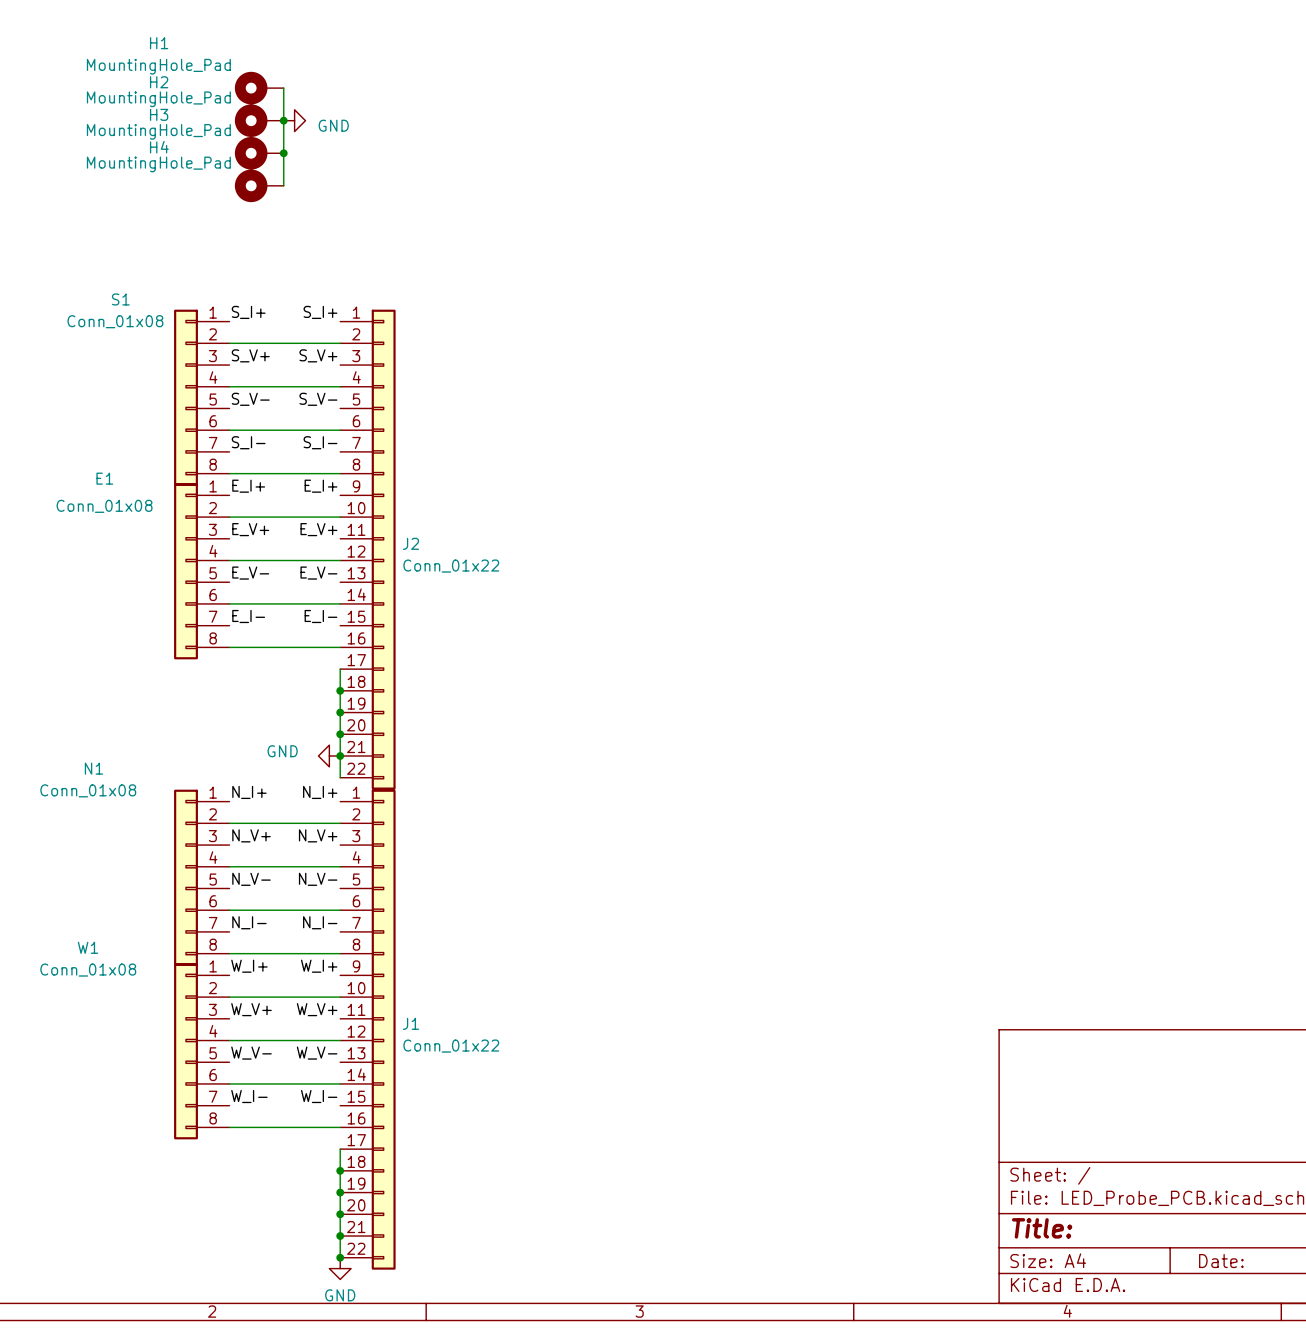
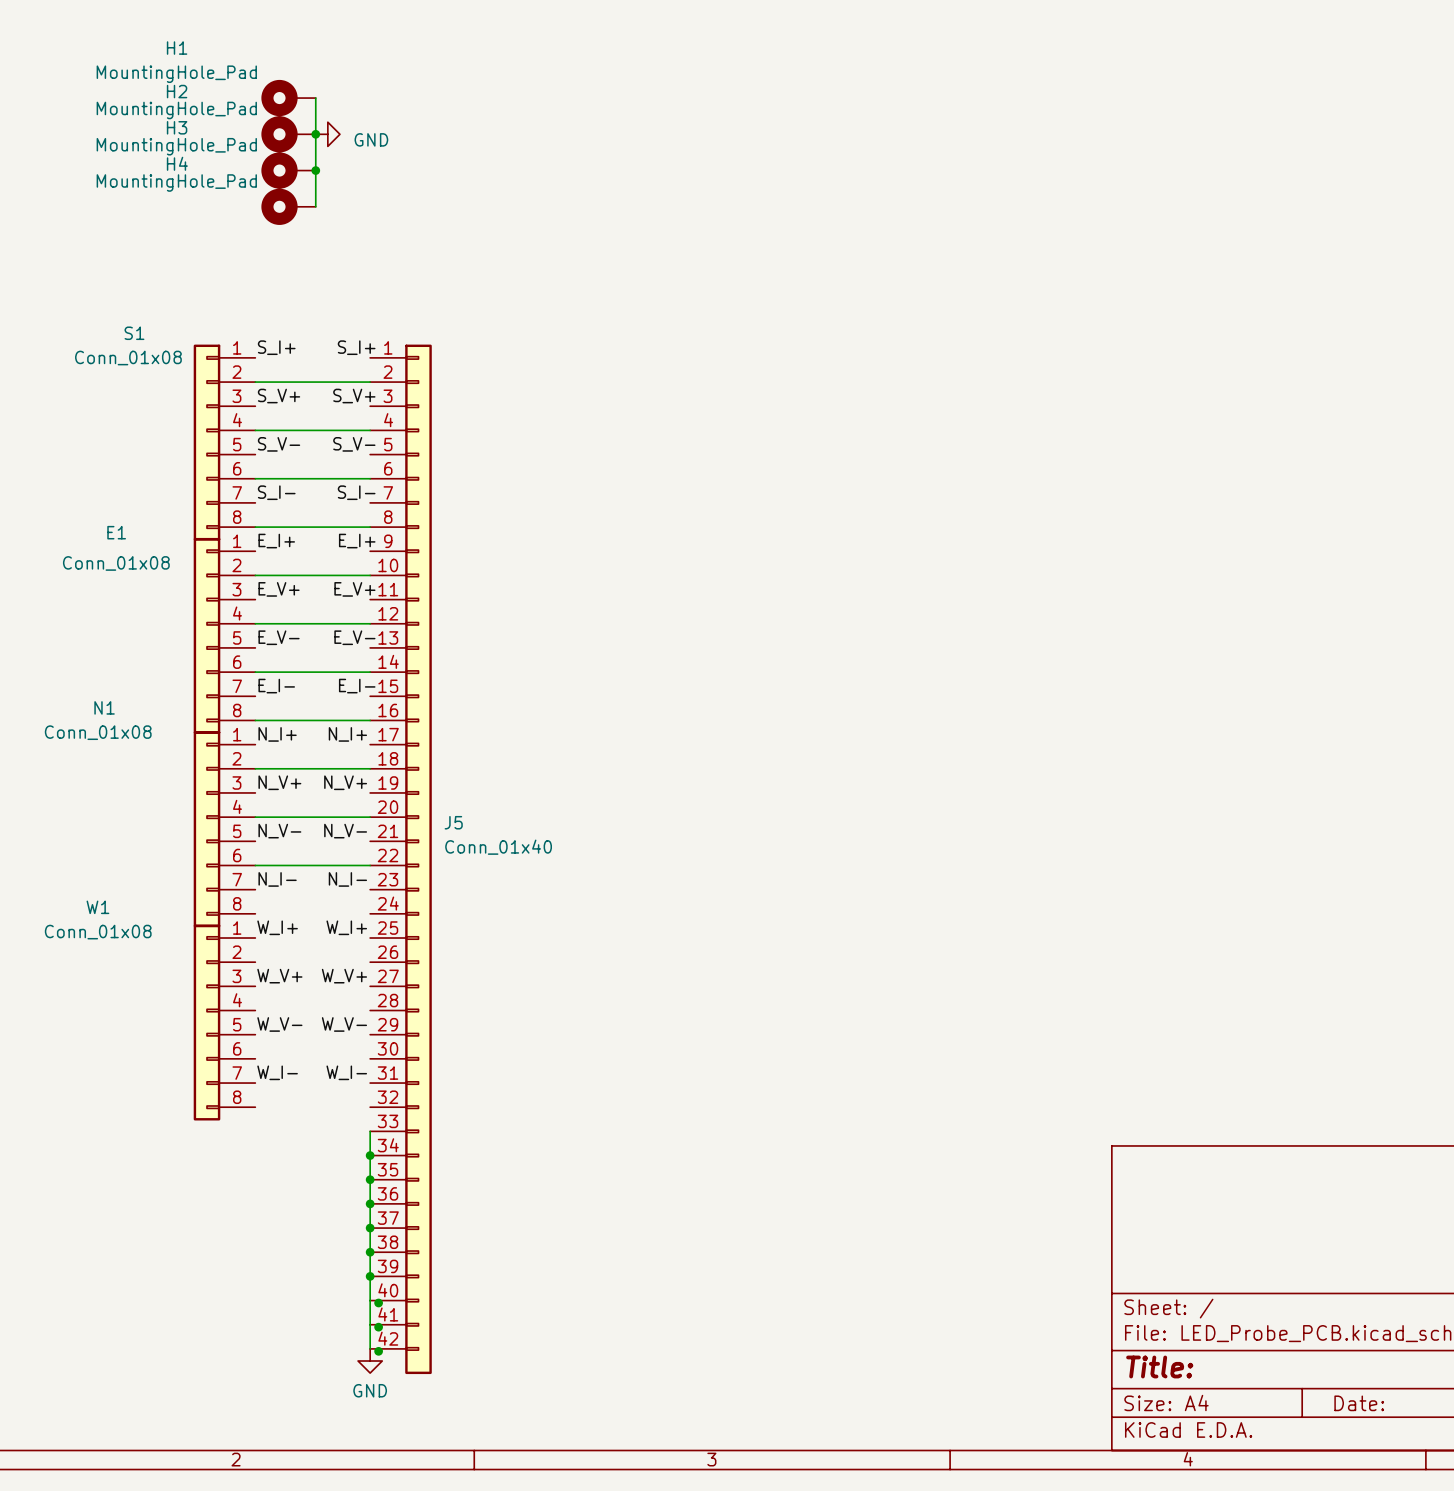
J2: Conn_01x22 (367, 549) -> none
label: none -> N_I+ (277, 734)
label: none -> N_I+ (347, 734)
wire: (340, 669) (340, 777) -> none
wire: none -> (255, 768) (370, 768)
junction: (340, 690) -> none
label: none -> N_V+ (279, 782)
label: none -> N_V+ (345, 782)
junction: (340, 712) -> none
wire: none -> (255, 817) (370, 817)
junction: (340, 734) -> none
label: none -> N_V- (279, 831)
label: none -> N_V- (345, 831)
power symbol: GND (329, 756) -> none
junction: (340, 756) -> none
J5: none -> Conn_01x40 (400, 859)
wire: none -> (255, 865) (370, 865)
label: N_I+ (249, 792) -> N_I- (277, 879)
label: N_I+ (320, 792) -> N_I- (347, 879)
wire: (229, 823) (340, 823) -> none
label: N_V+ (251, 835) -> W_I+ (277, 927)
label: N_V+ (318, 835) -> W_I+ (346, 927)
wire: (229, 866) (340, 866) -> none
N1 position: (201, 877) -> (224, 829)
label: N_V- (251, 879) -> W_V+ (279, 976)
label: N_V- (318, 879) -> W_V+ (344, 976)
wire: (229, 910) (340, 910) -> none
label: N_I- (249, 922) -> W_V- (279, 1024)
label: N_I- (320, 922) -> W_V- (344, 1024)
wire: (229, 953) (340, 953) -> none
label: W_I+ (249, 966) -> W_I- (277, 1072)
label: W_I+ (319, 966) -> W_I- (346, 1072)
wire: (229, 997) (340, 997) -> none
label: W_V+ (251, 1009) -> none
label: W_V+ (317, 1009) -> none
wire: none -> (370, 1131) (370, 1348)
J1: Conn_01x22 (367, 1029) -> none
junction: none -> (370, 1155)
wire: (229, 1040) (340, 1040) -> none
W1 position: (201, 1051) -> (224, 1022)
label: W_V- (251, 1053) -> none
label: W_V- (317, 1053) -> none
junction: none -> (370, 1179)
junction: none -> (370, 1203)
wire: (229, 1083) (340, 1083) -> none
label: W_I- (249, 1096) -> none
label: W_I- (319, 1096) -> none
junction: none -> (370, 1228)
junction: none -> (370, 1252)
wire: (229, 1127) (340, 1127) -> none
junction: none -> (370, 1276)
wire: (340, 1149) (340, 1257) -> none
junction: (340, 1236) -> none
junction: (340, 1257) -> none
power symbol position: GND (340, 1268) -> GND (370, 1361)

